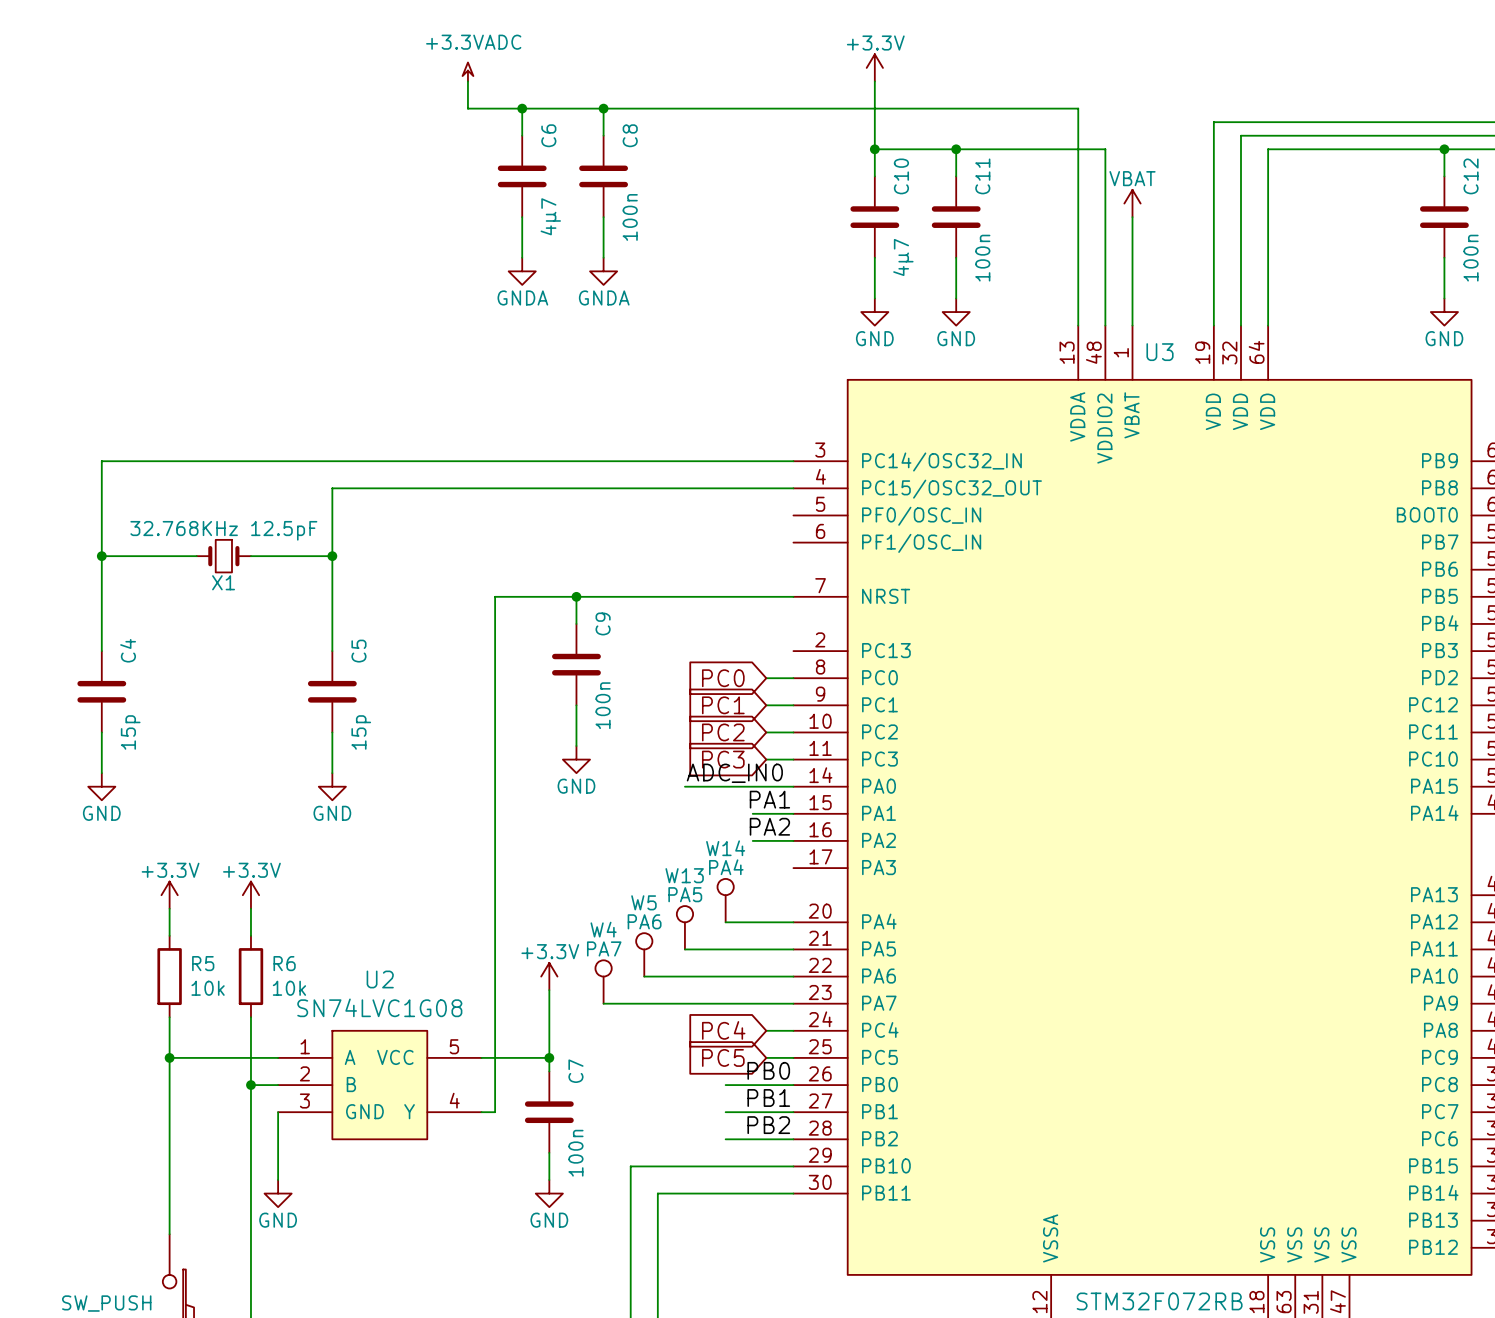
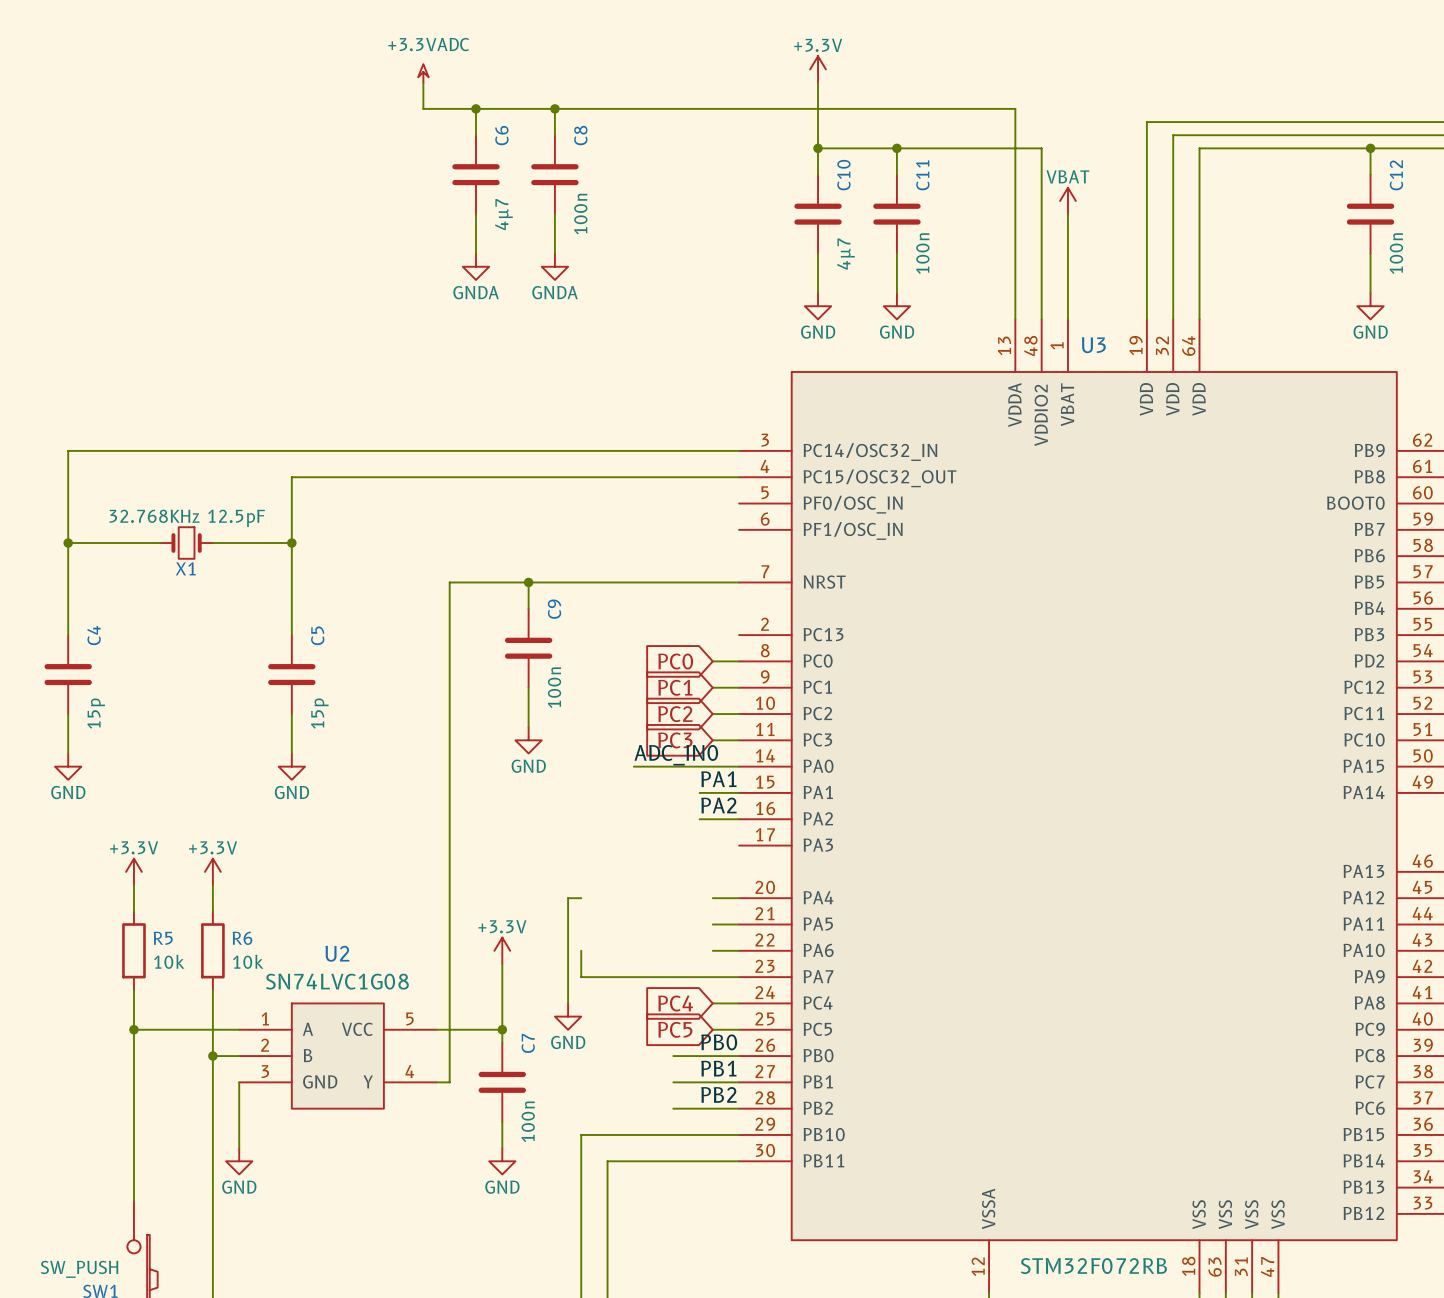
W14: PA4 (725, 900) -> none
wire: none -> (581, 898) (568, 898) (568, 1003)
wire: (725, 922) (766, 922) -> none
W13: PA5 (684, 927) -> none
wire: (684, 949) (766, 949) -> none
W5: PA6 (644, 954) -> none
wire: (644, 976) (766, 976) -> none
W4: PA7 (603, 981) -> none
wire: (603, 1003) (630, 1003) -> (581, 950) (581, 977)
power symbol: none -> GND (568, 1016)

